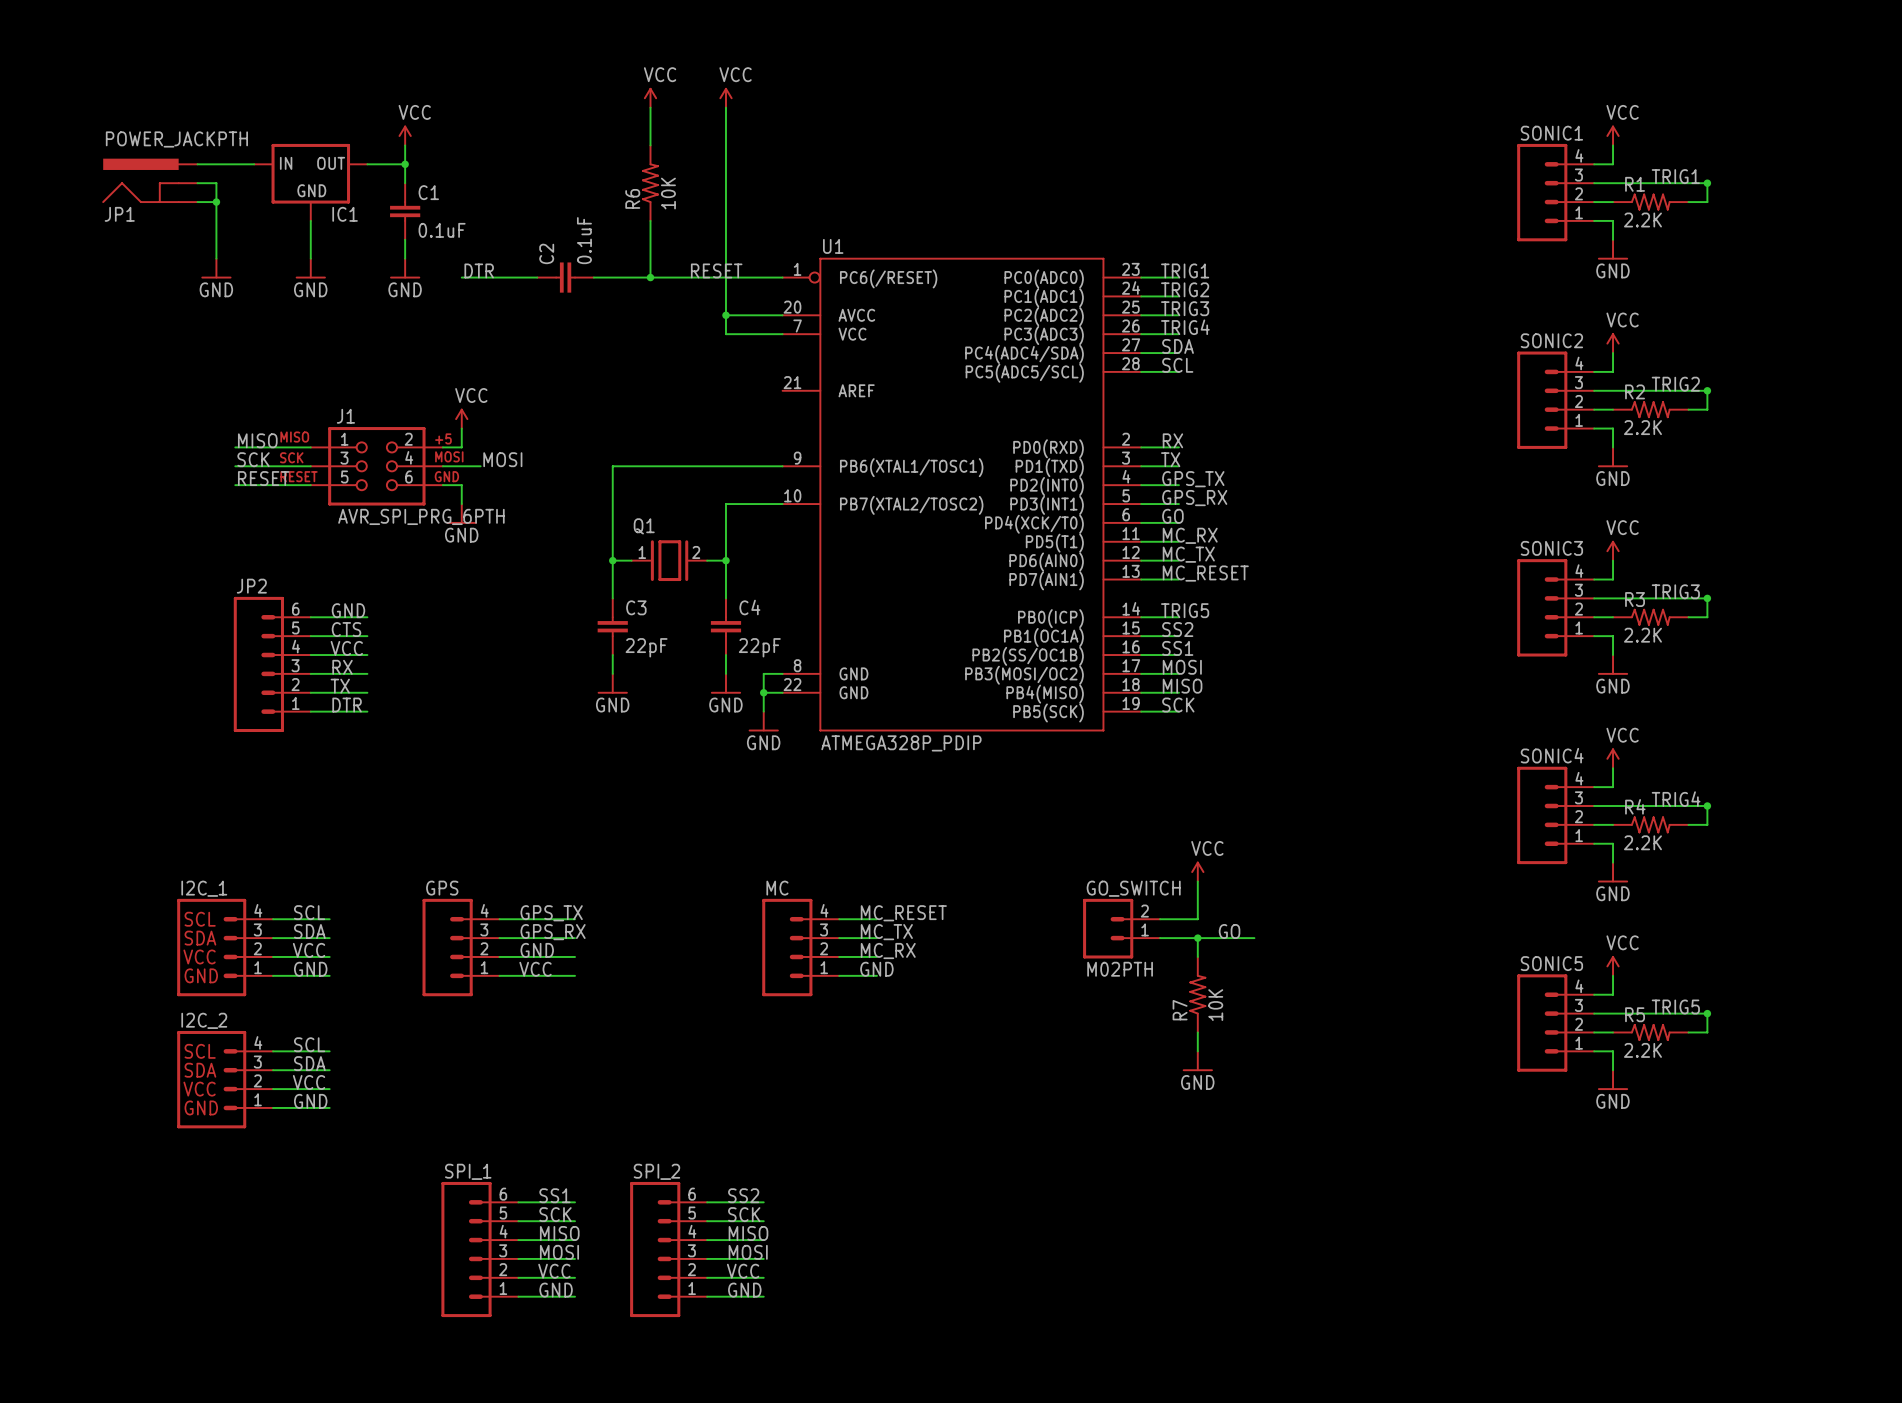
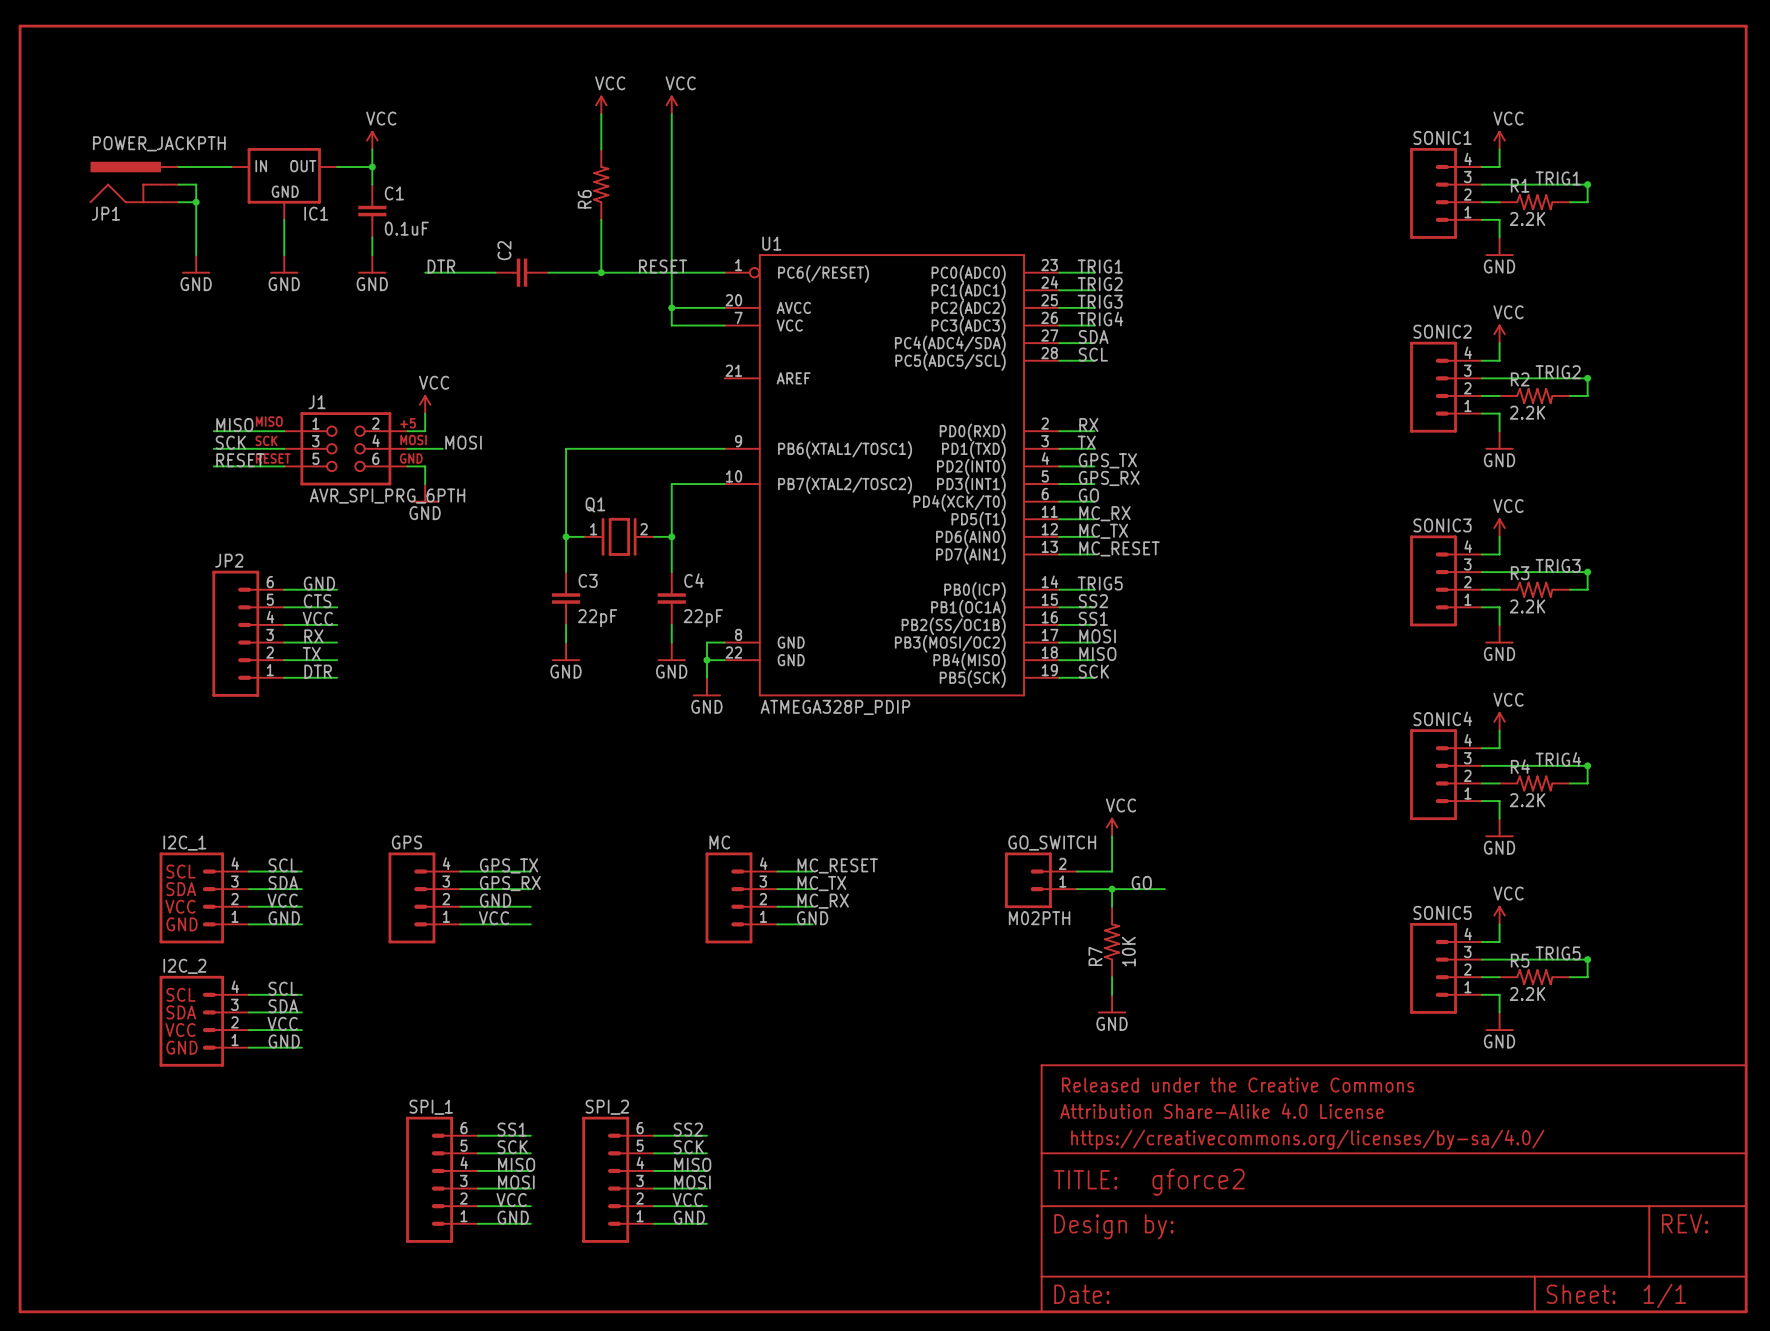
R6 value: 10K (668, 193) -> none
C2 value: 0.1uF (584, 240) -> none
part: none -> (883, 668)
part: none -> (1393, 1188)

